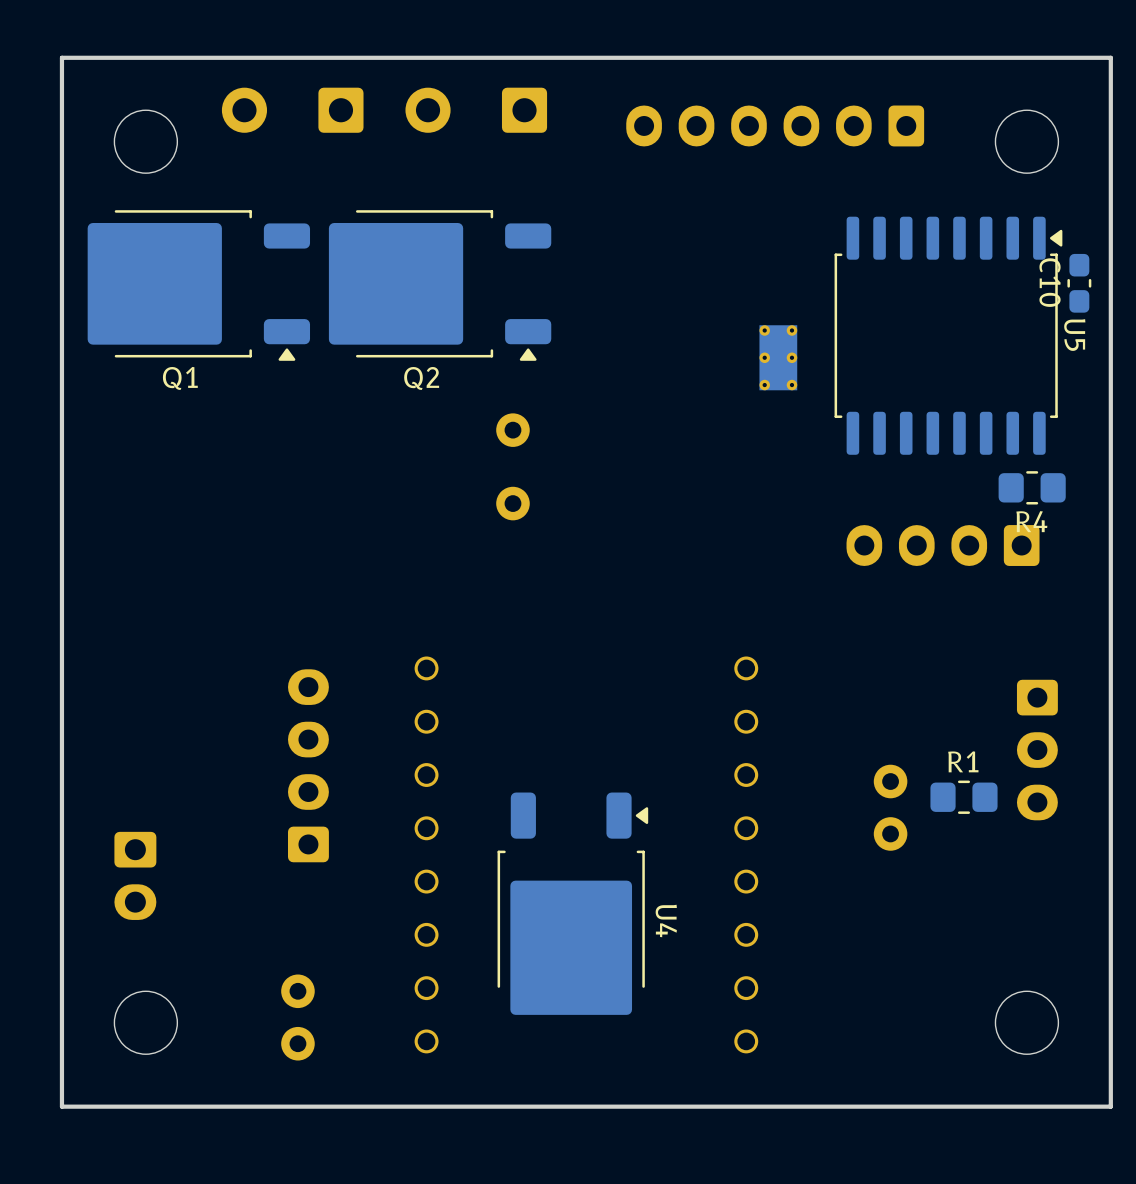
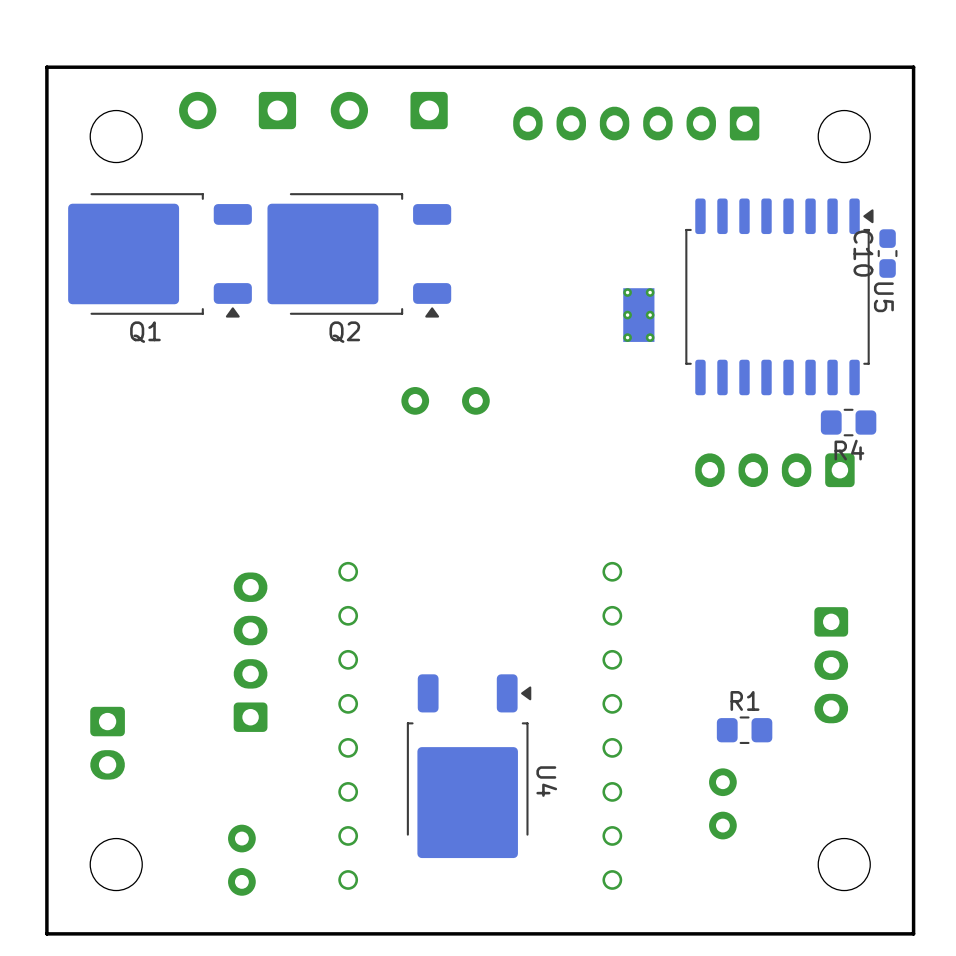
part rotation: 0° (512, 466) -> 90° clockwise (445, 400)
part position: (1037, 750) -> (831, 665)
R1 position: (963, 797) -> (744, 730)
part position: (890, 807) -> (722, 803)

